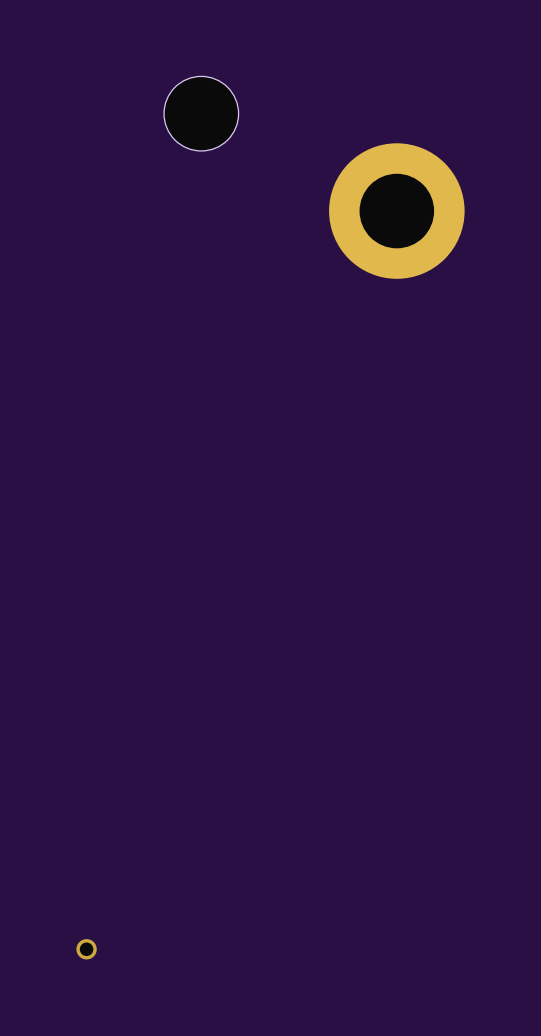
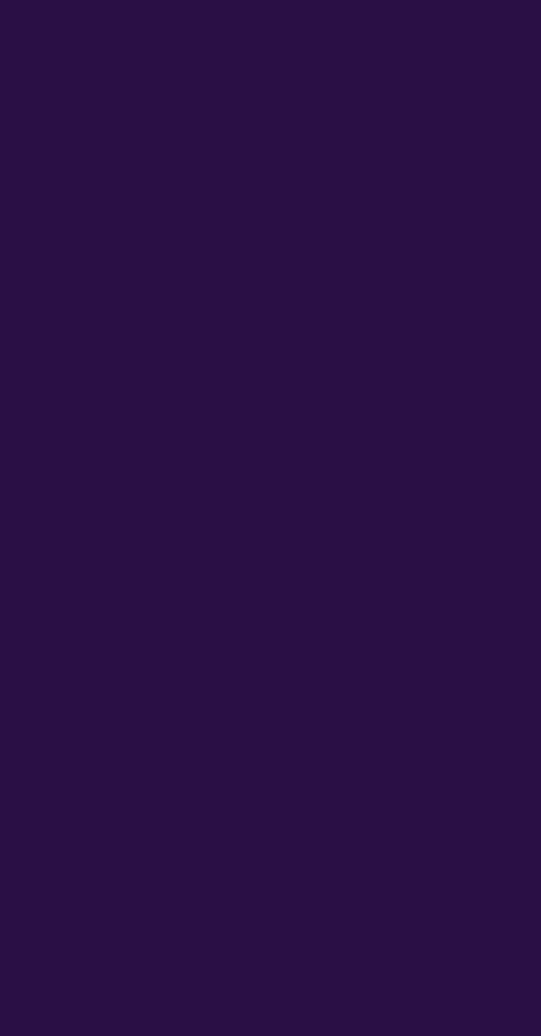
part: (201, 113) -> none
part: (396, 211) -> none
via: (86, 949) -> none

